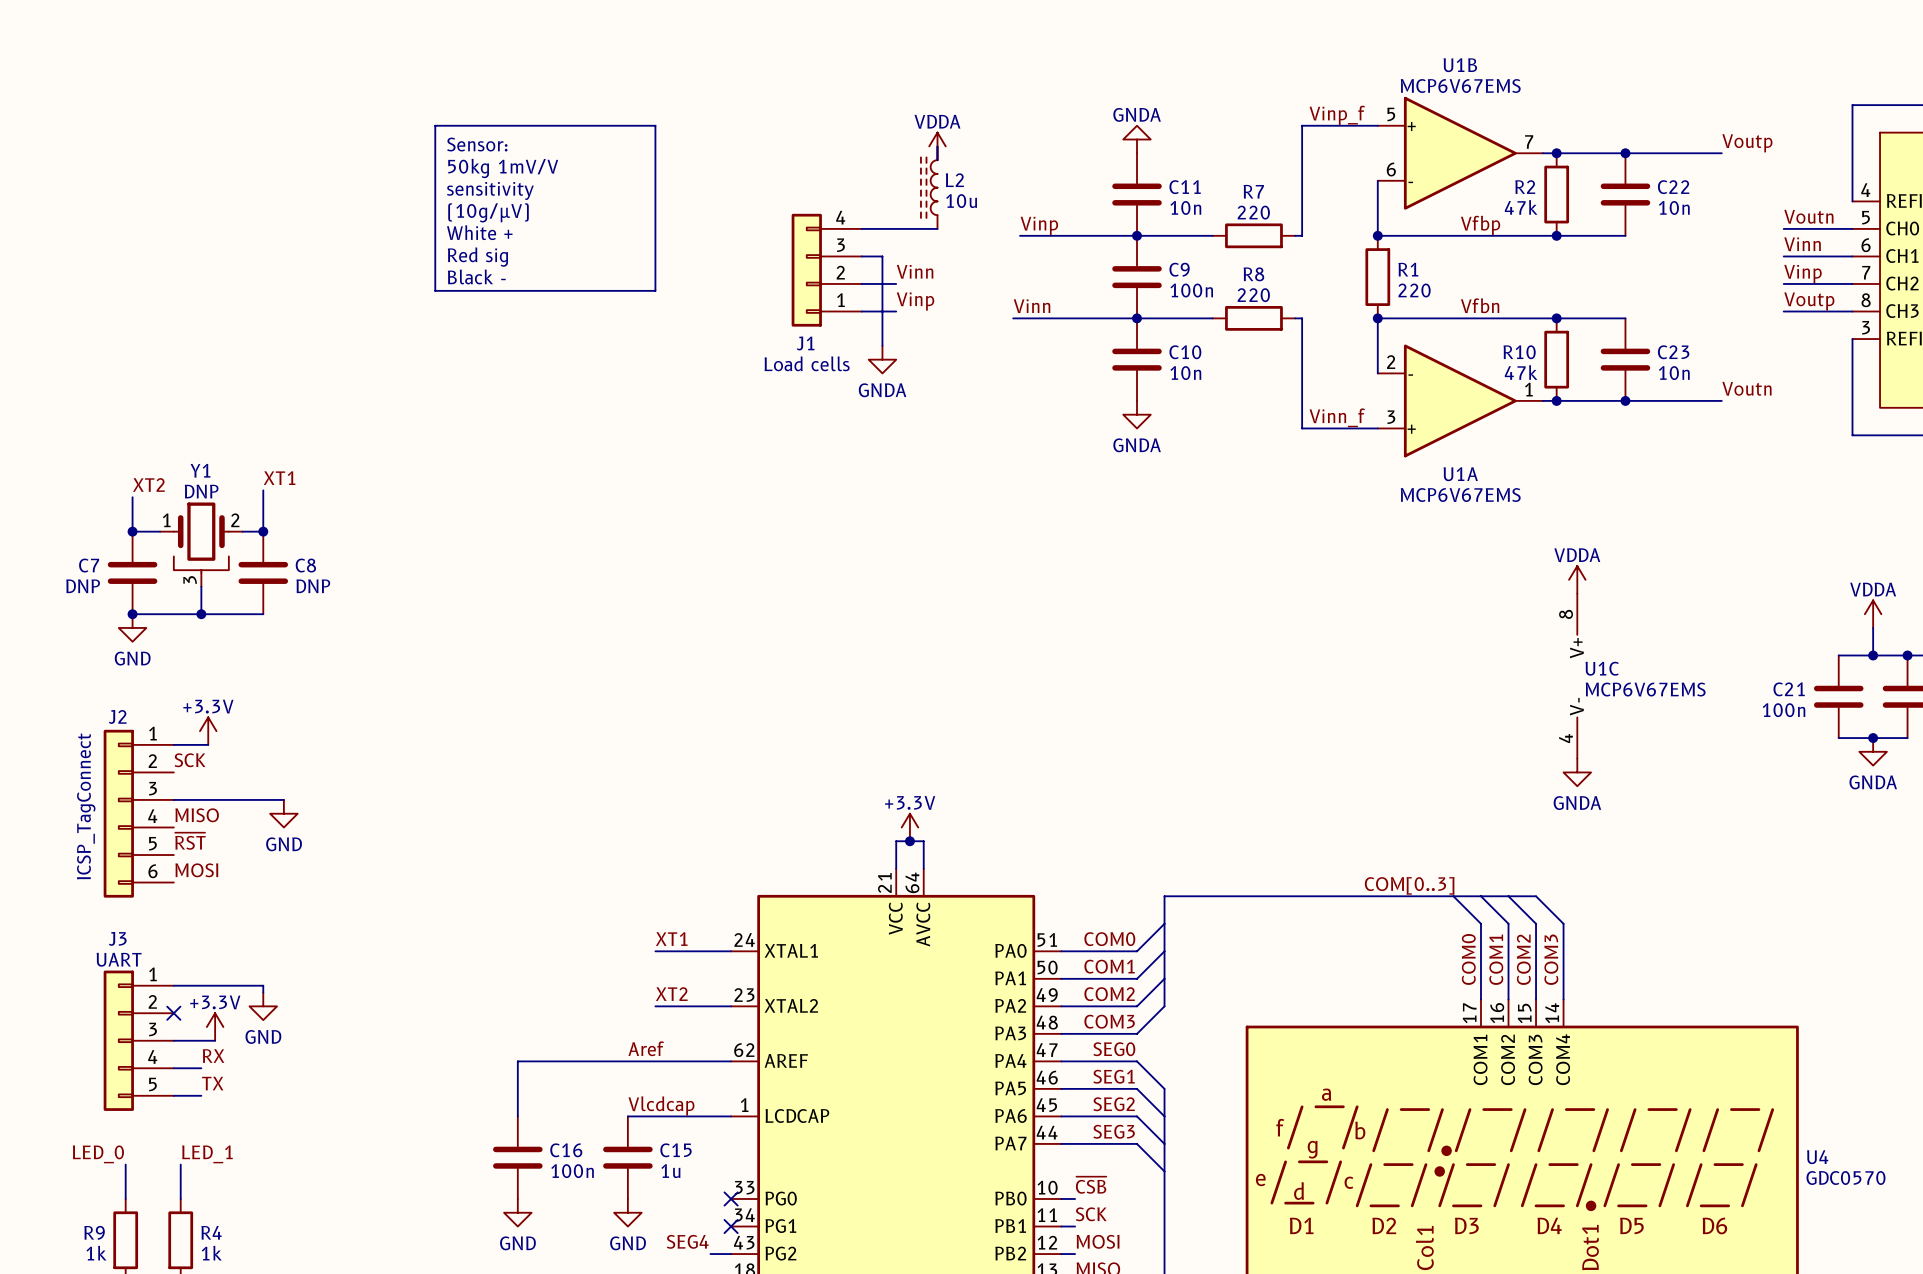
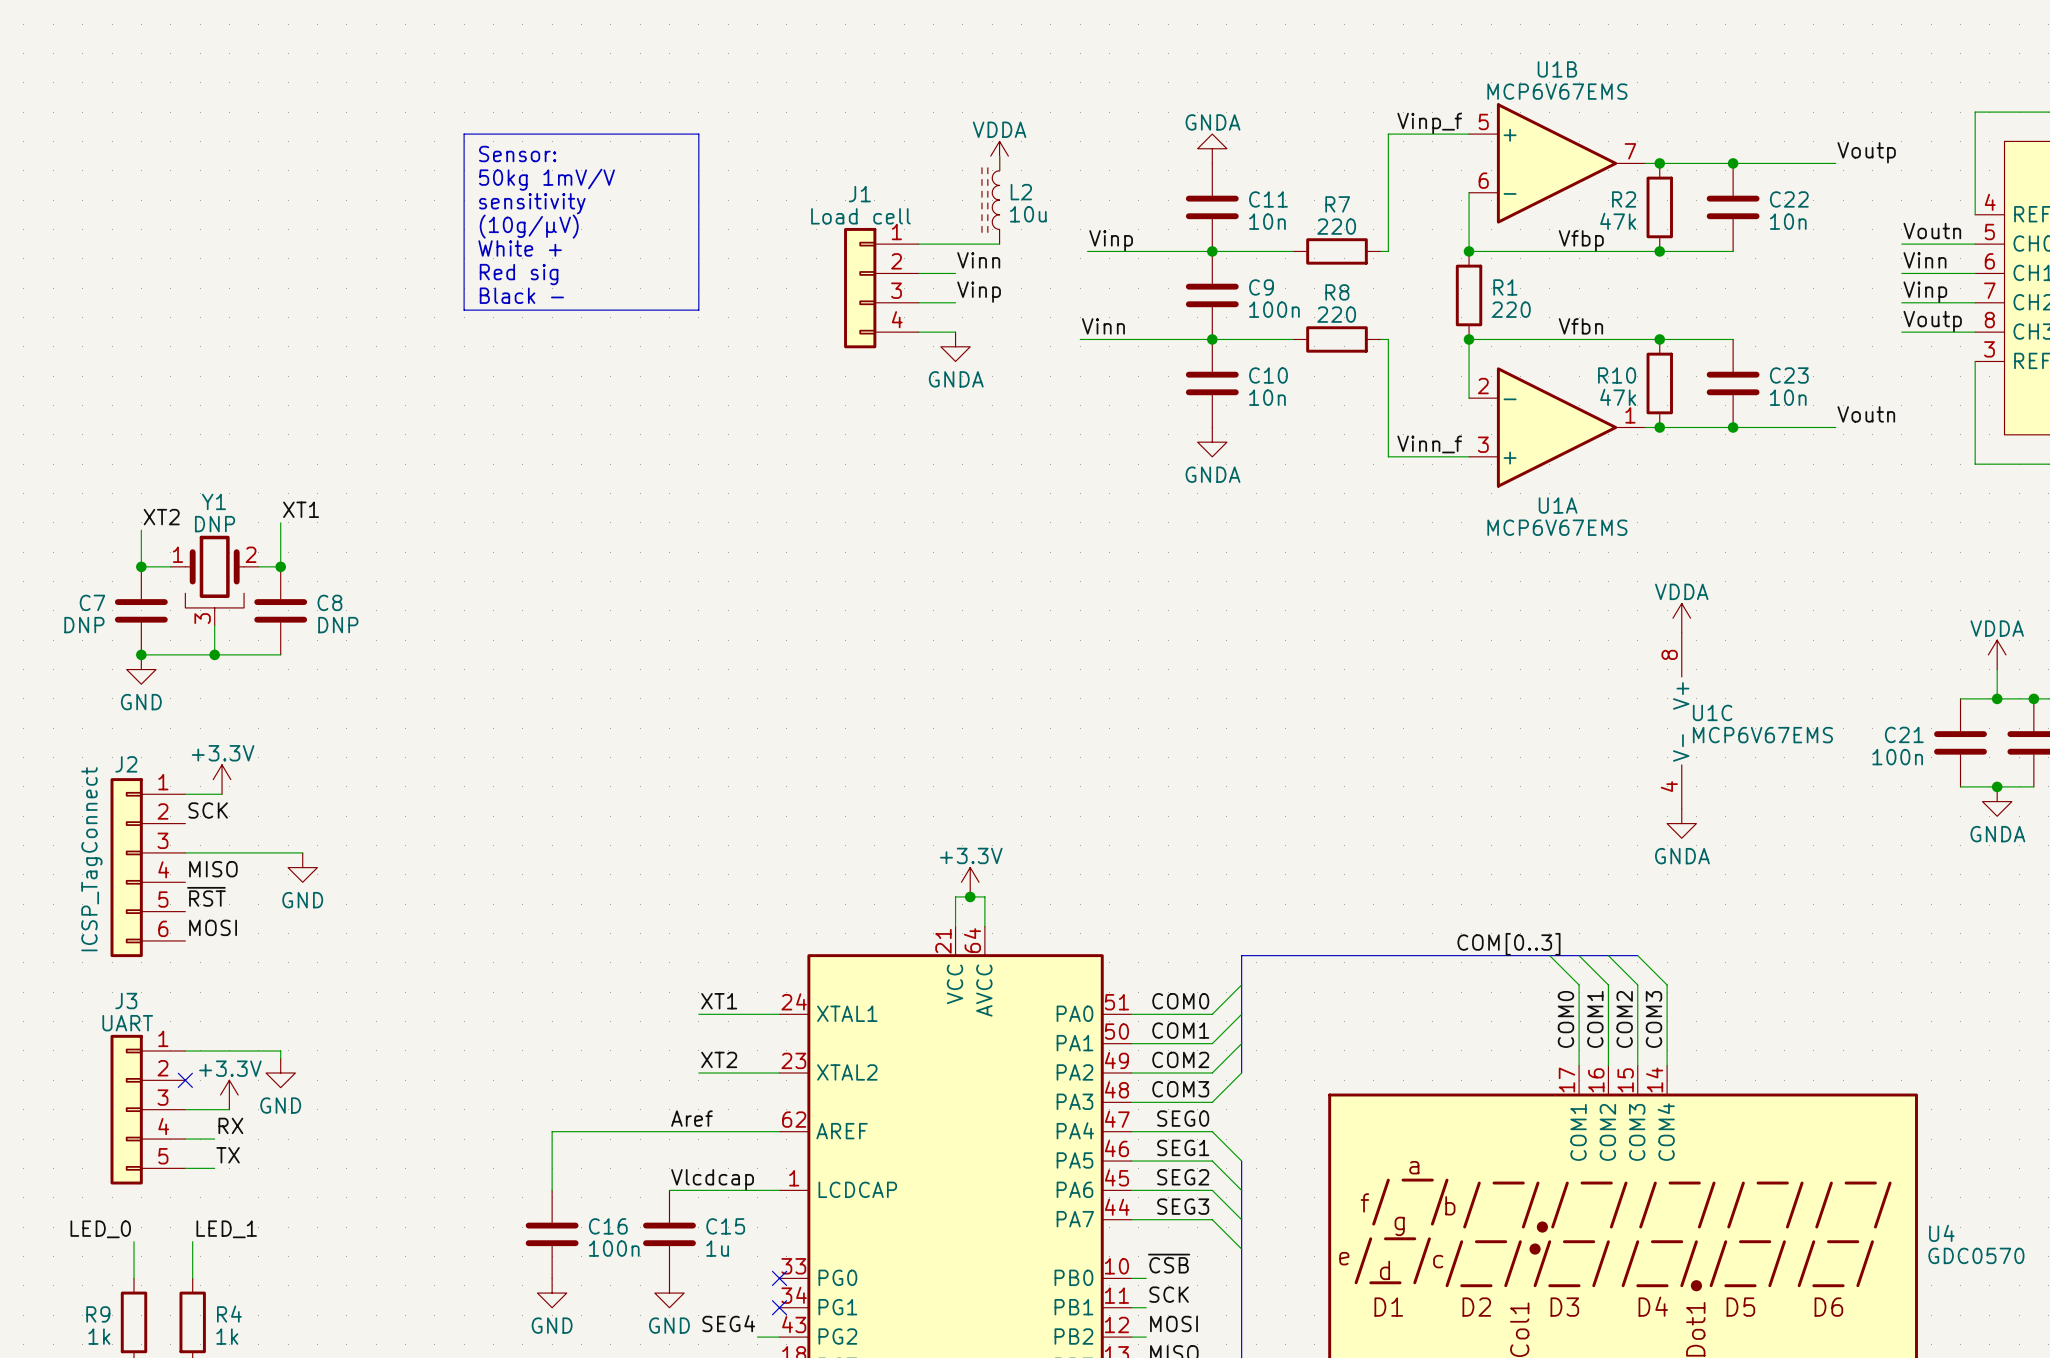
label: none -> Vinn (978, 260)
wire: (882, 256) (882, 345) -> (940, 273) (955, 273)
J1 flip: as is (806, 270) -> up-down (860, 288)
label: Vinn (915, 271) -> Vinp (979, 292)
label: Vinp (915, 301) -> none
power symbol position: GNDA (882, 359) -> GNDA (955, 346)
J1 value: Load cells (807, 363) -> Load cell (860, 216)

